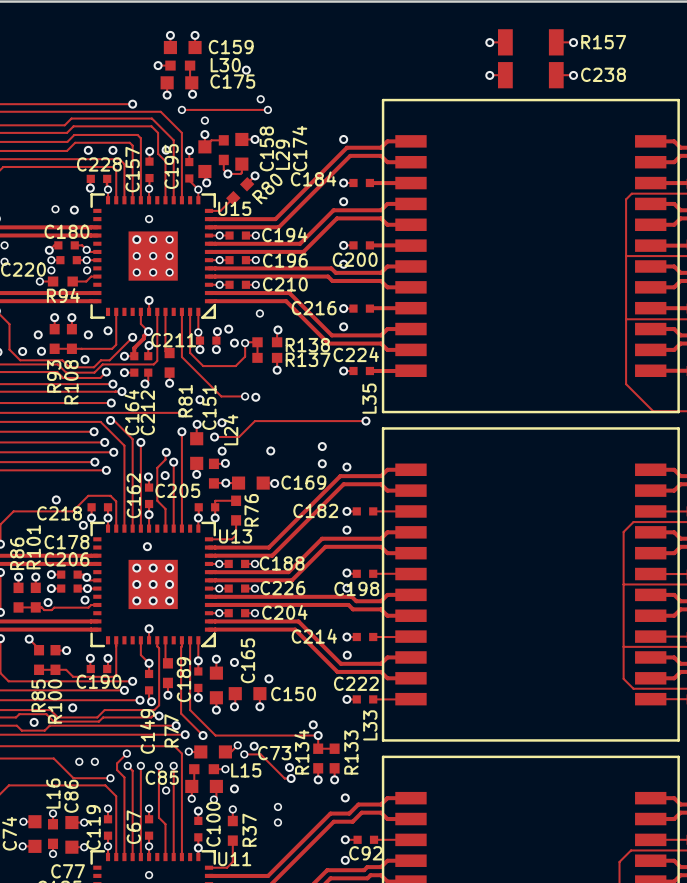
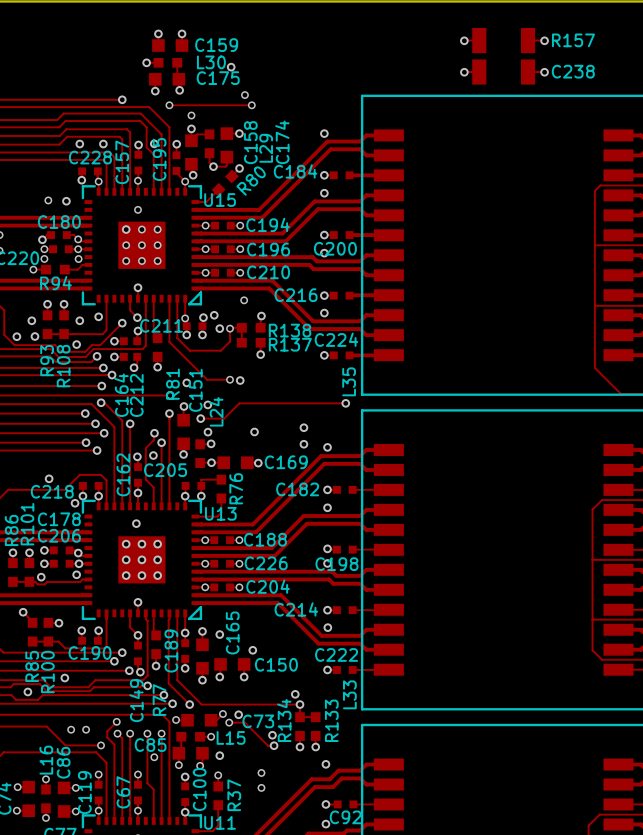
track: (148, 331) (134, 348) (134, 356) -> none

